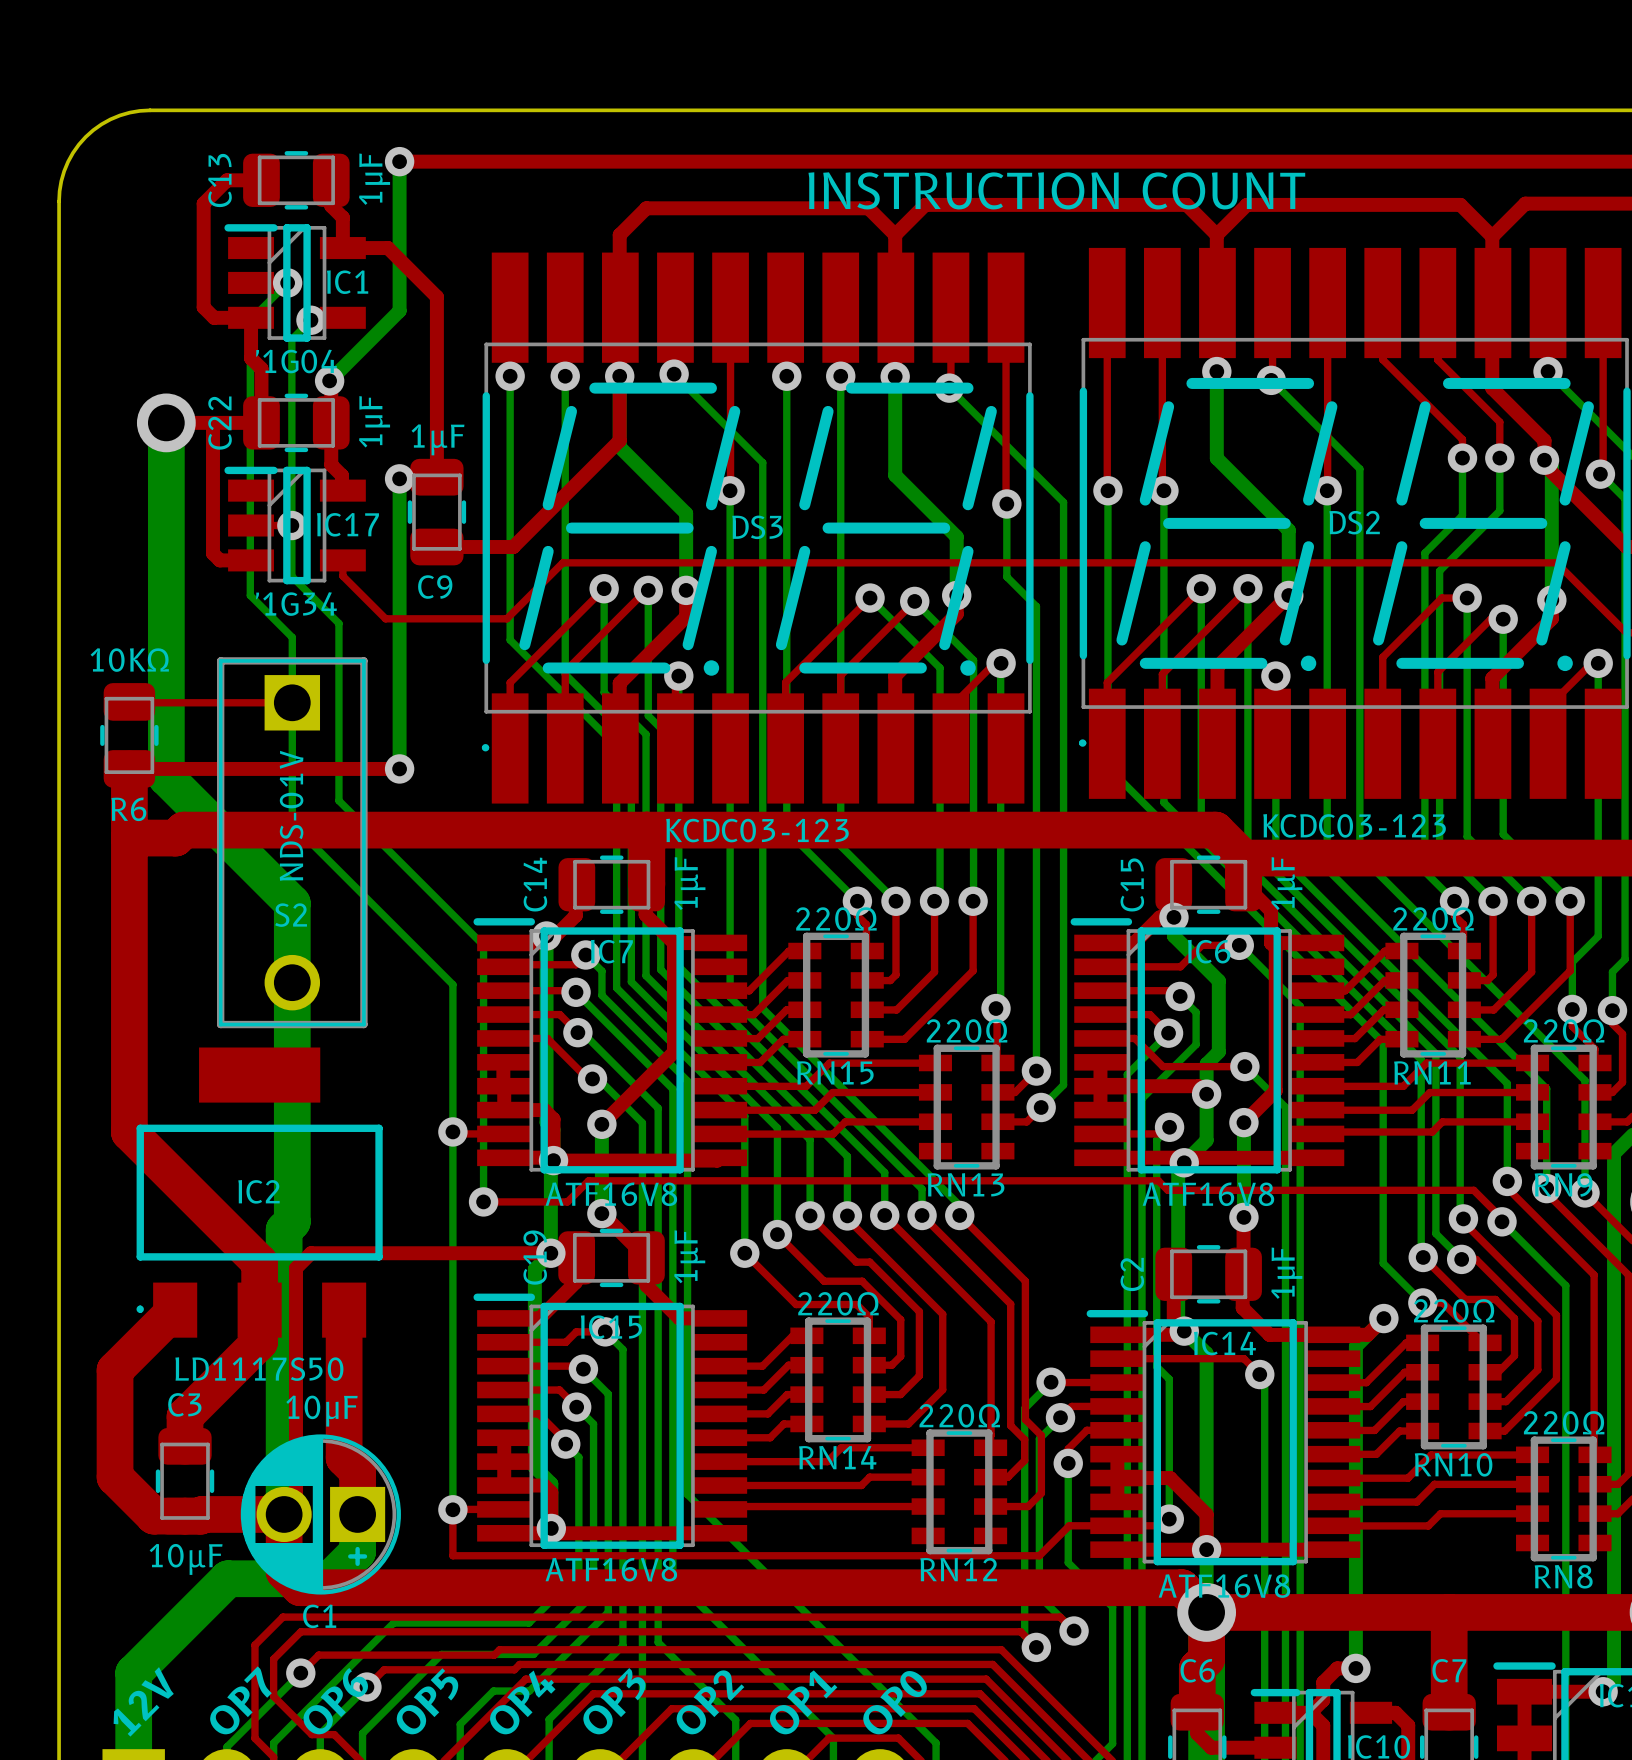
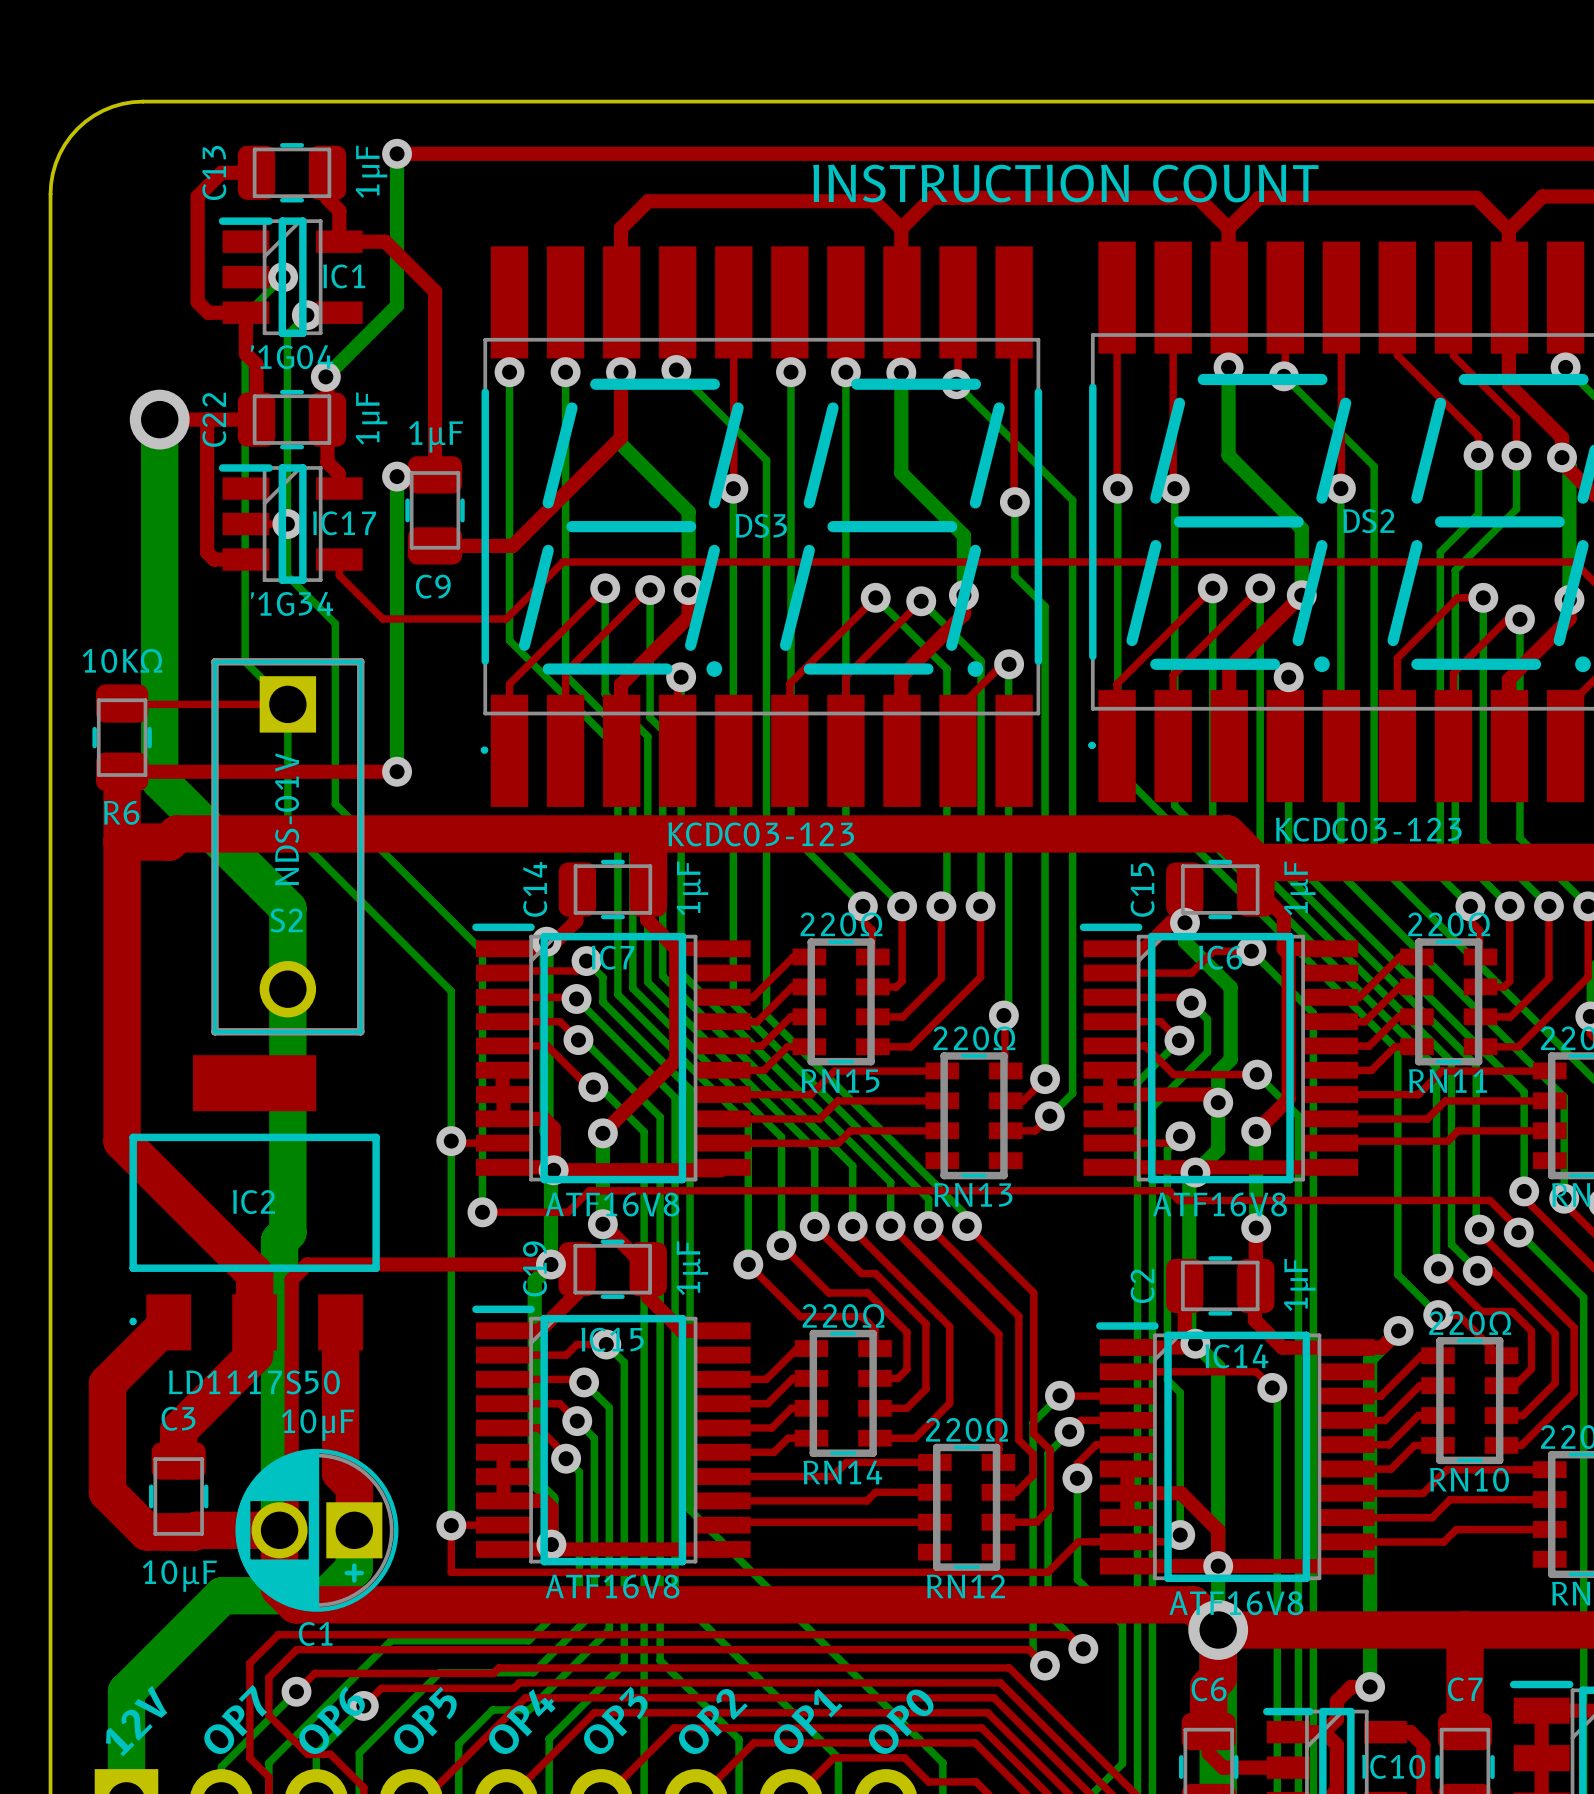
bottom track: (250, 595) (292, 637) (292, 702) -> (245, 595) (245, 661) (287, 704)

